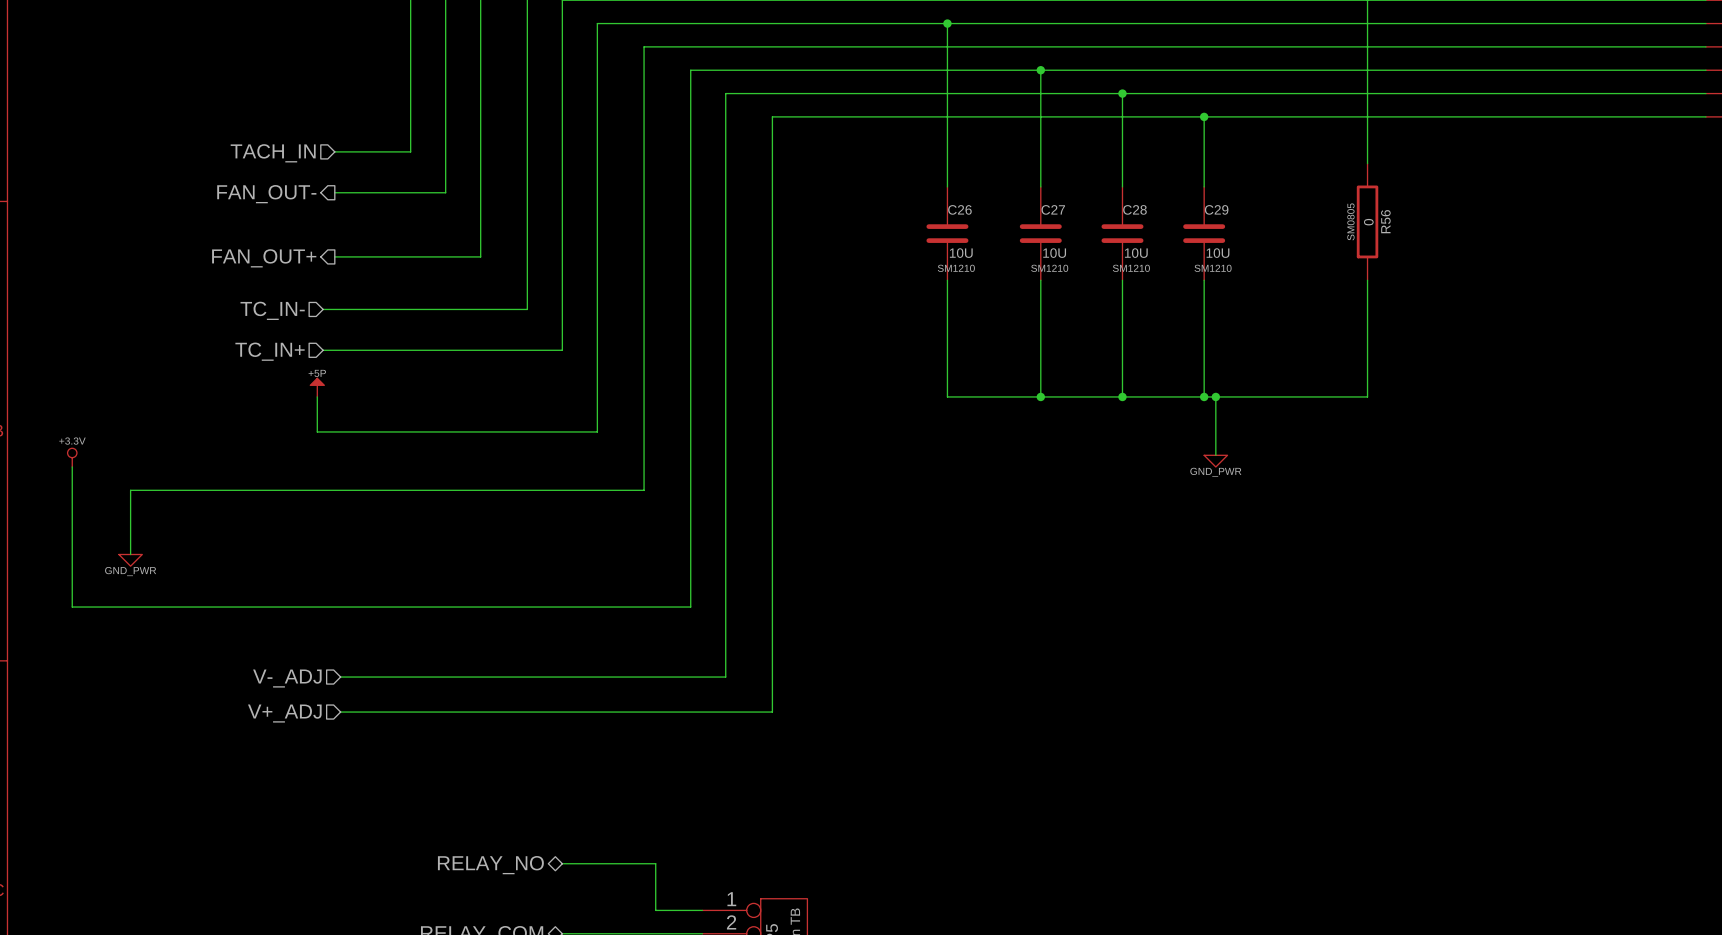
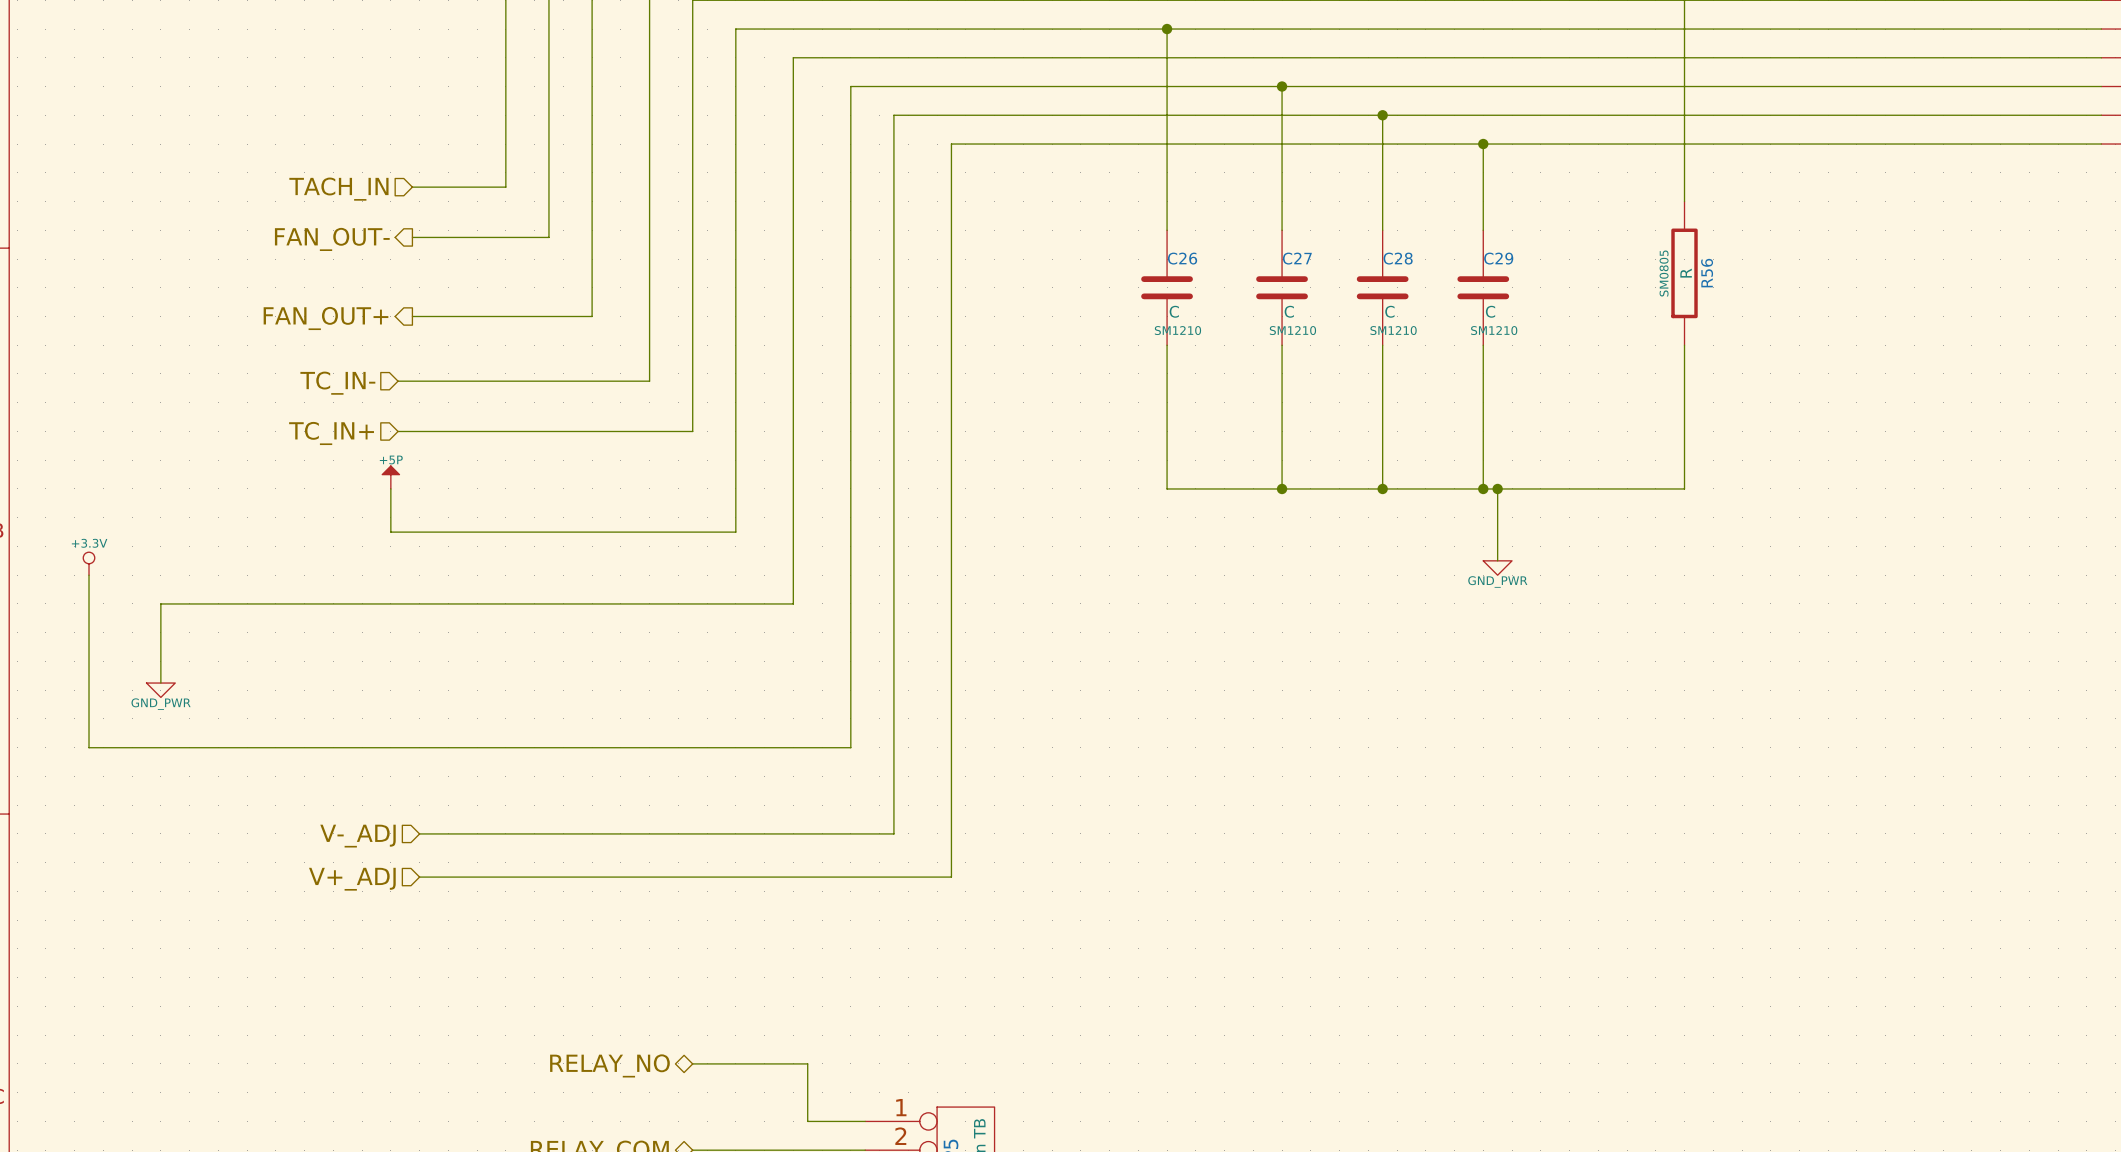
R56 value: 0 (1368, 222) -> R (1686, 273)
C26 value: 10U (961, 253) -> C (1174, 311)
C27 value: 10U (1054, 253) -> C (1289, 311)
C28 value: 10U (1136, 253) -> C (1389, 311)
C29 value: 10U (1218, 253) -> C (1490, 311)

